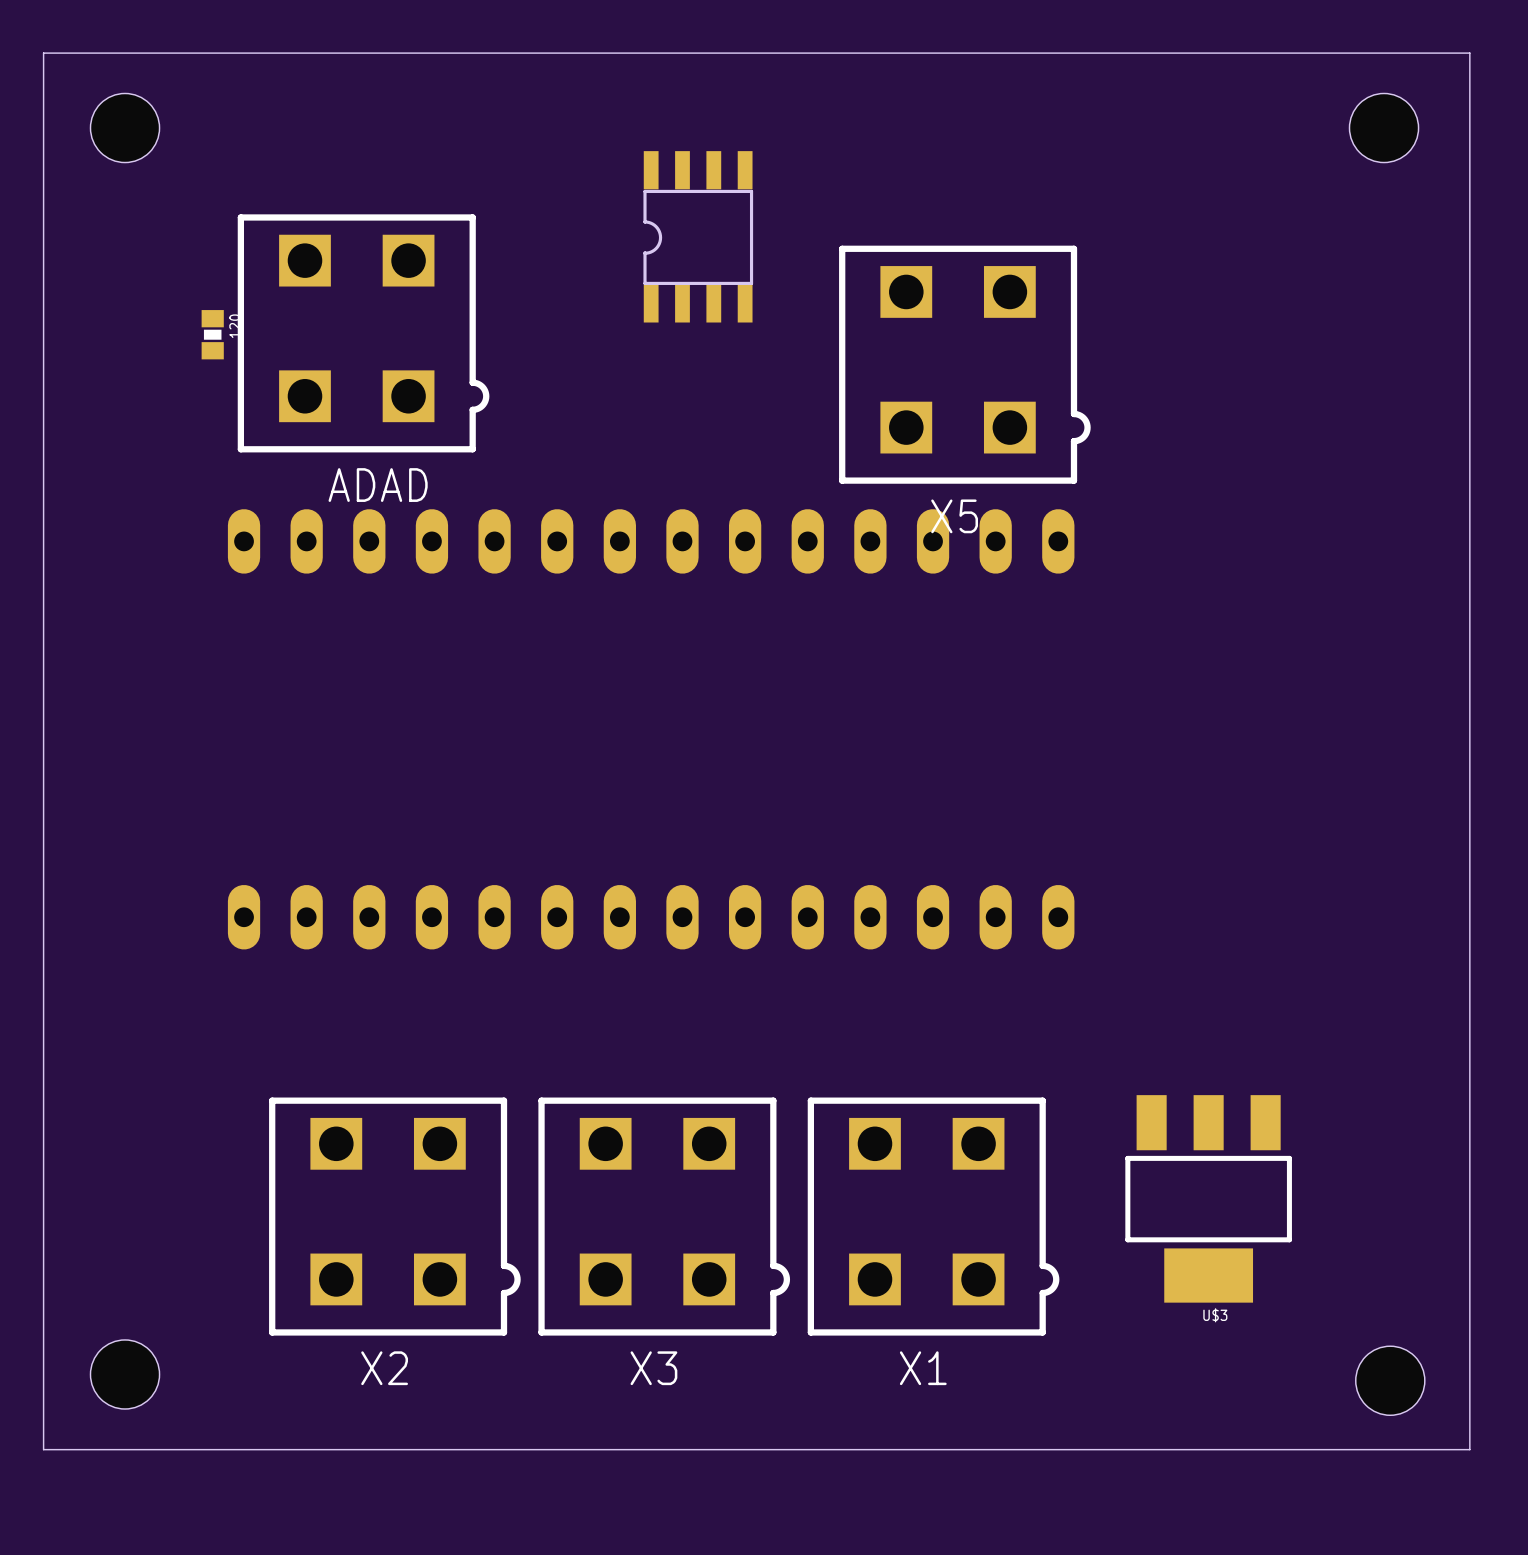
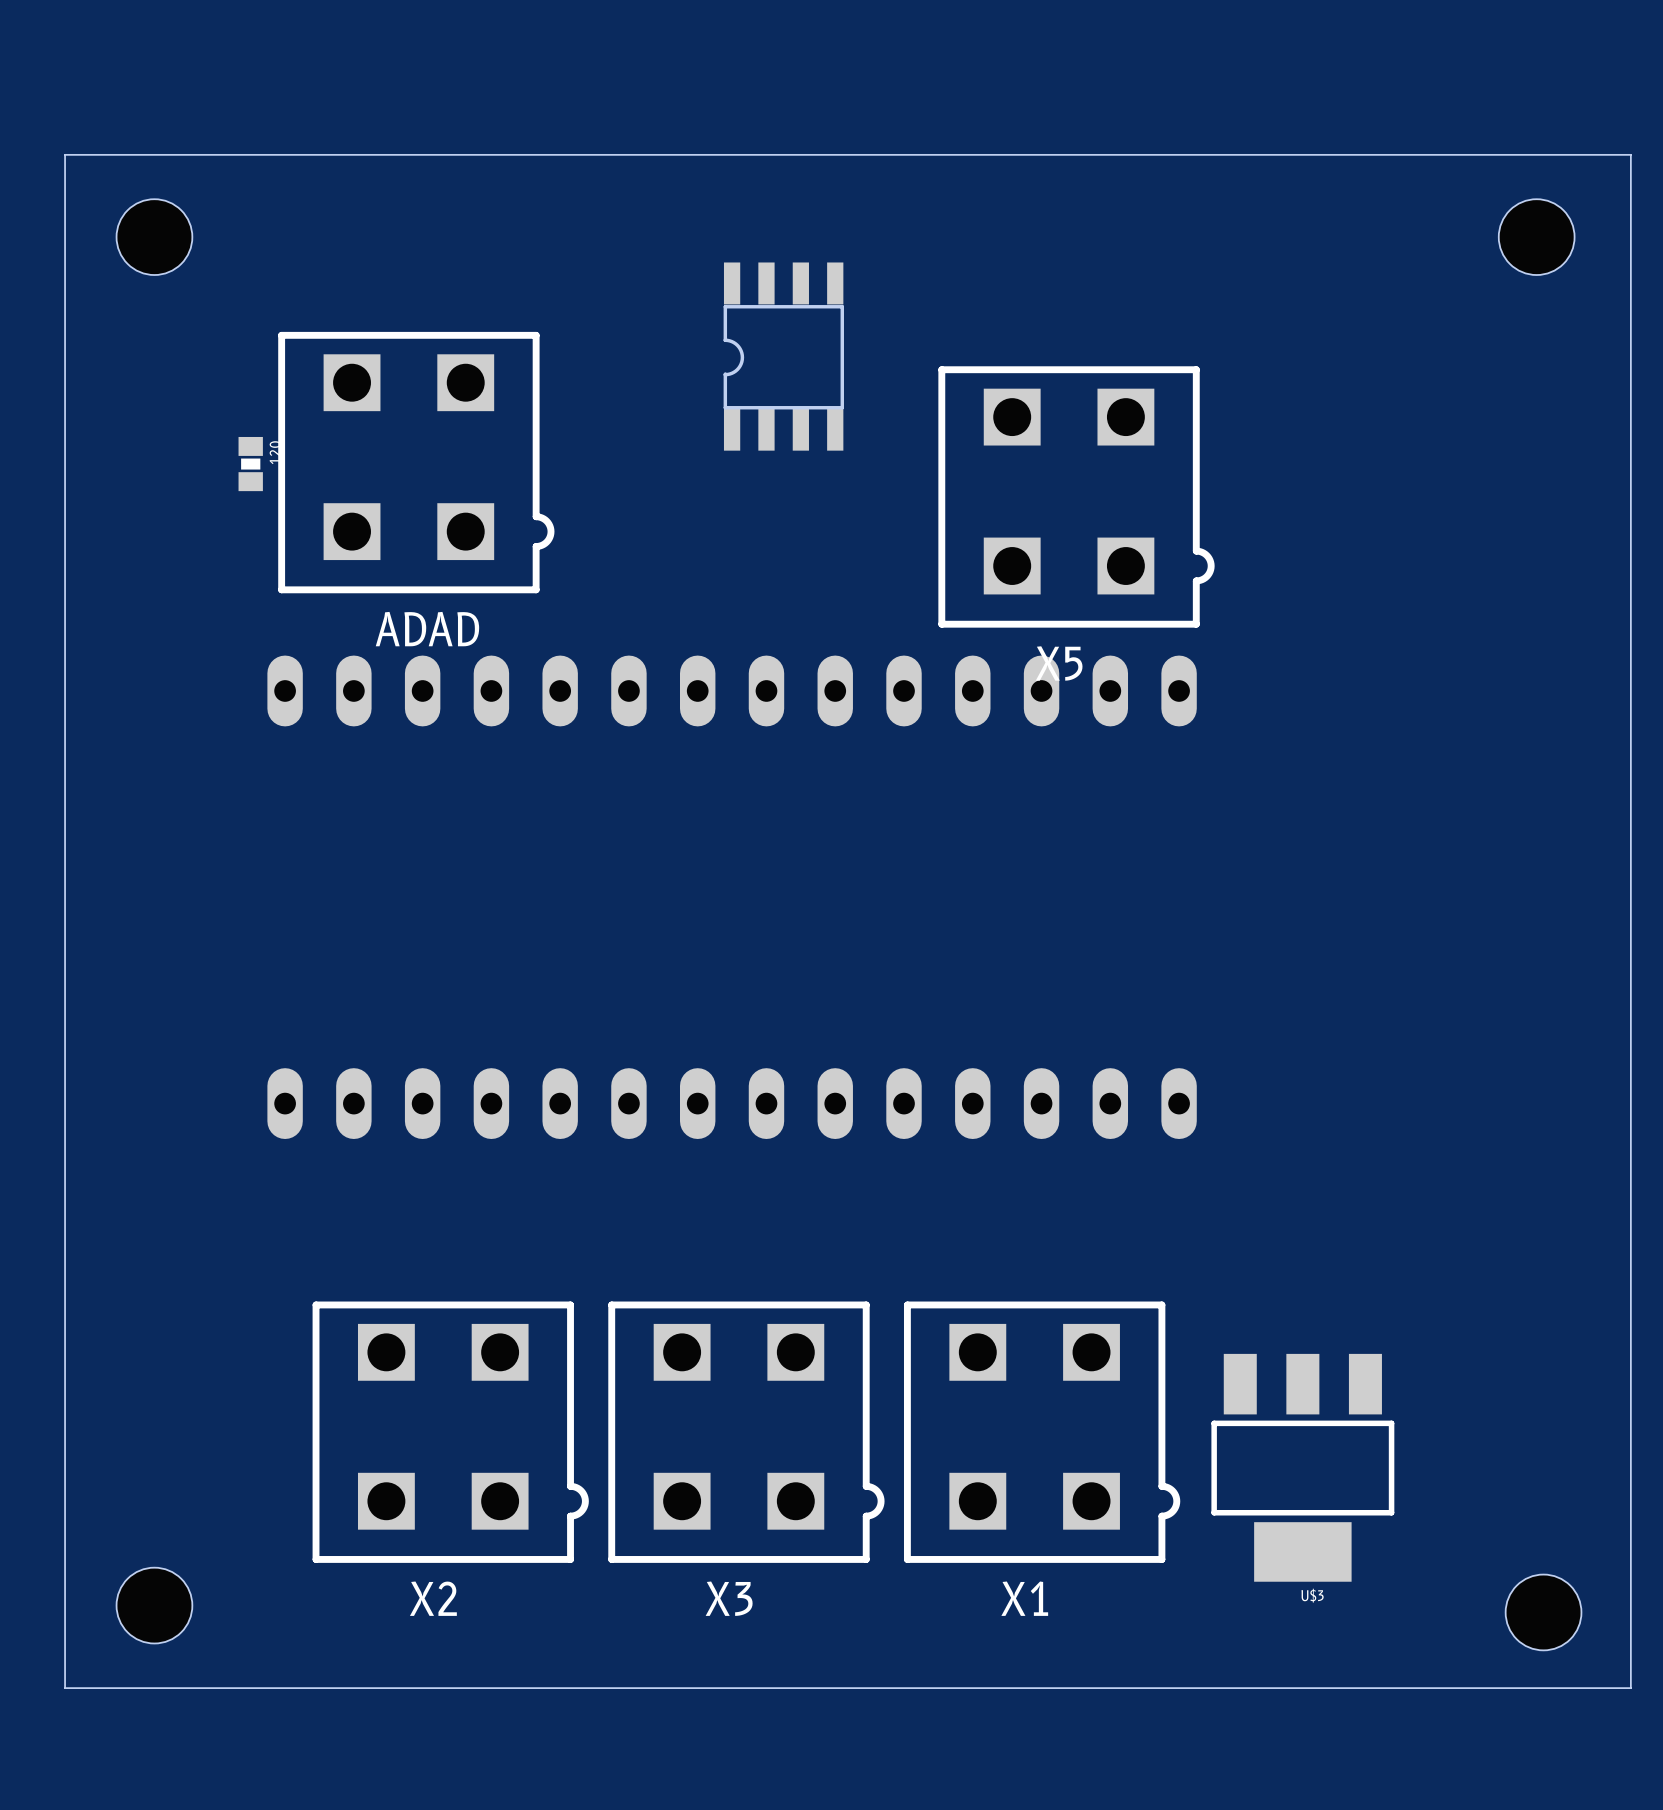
U$3 position: (1208, 1198) -> (1302, 1467)

